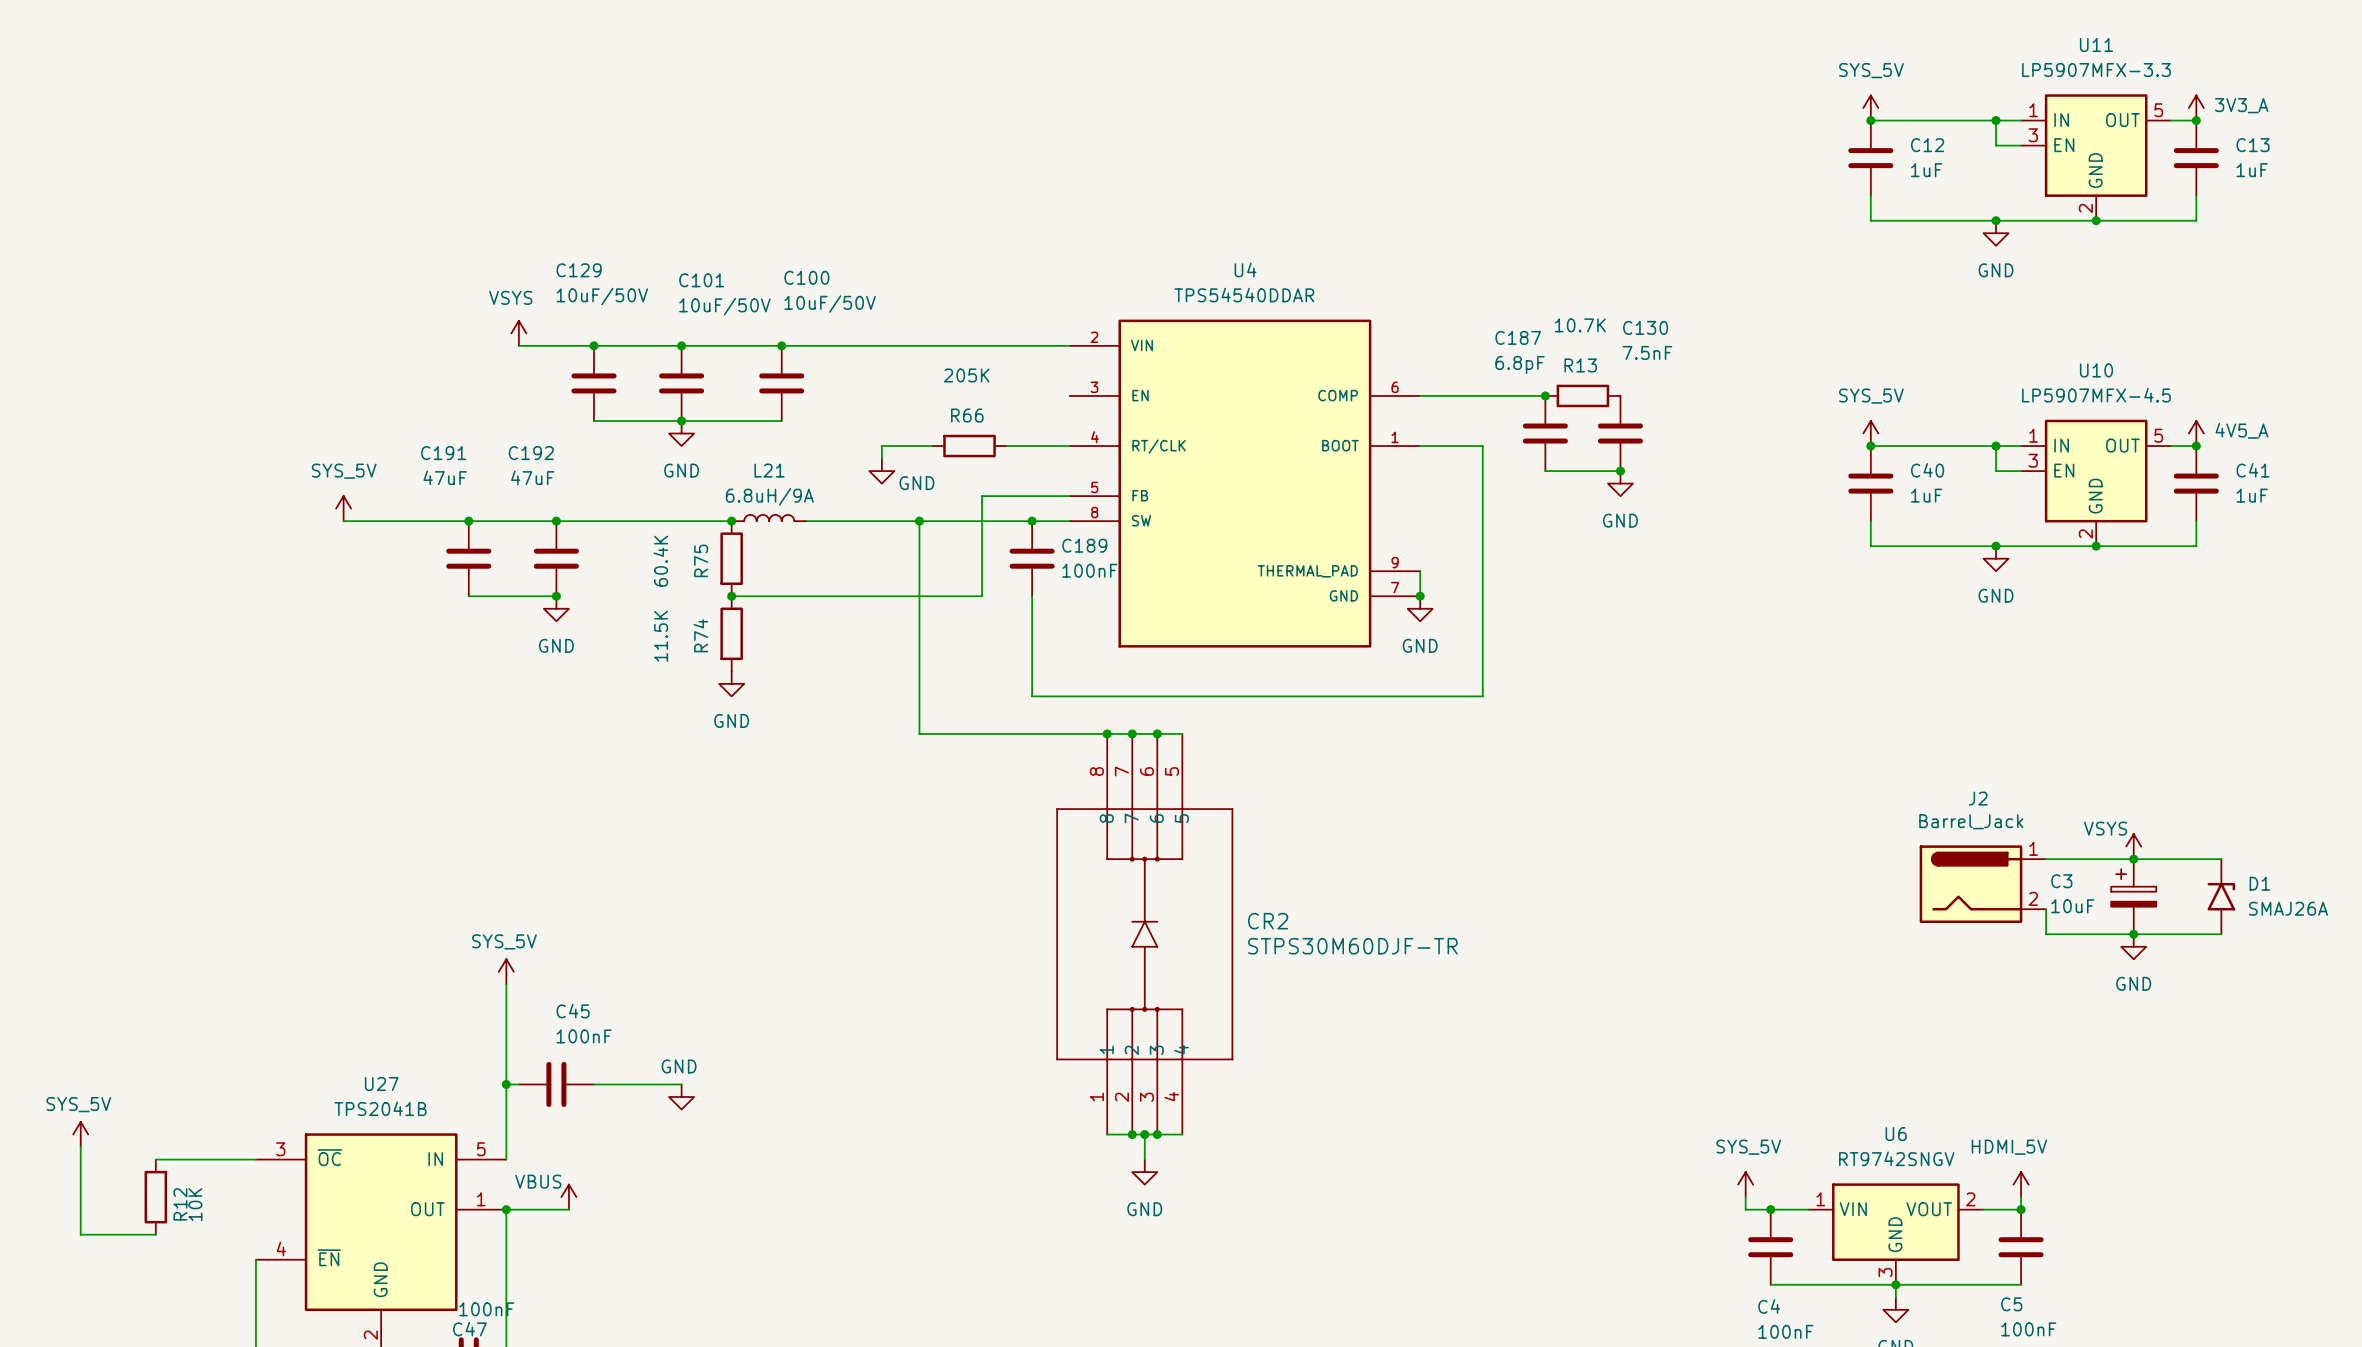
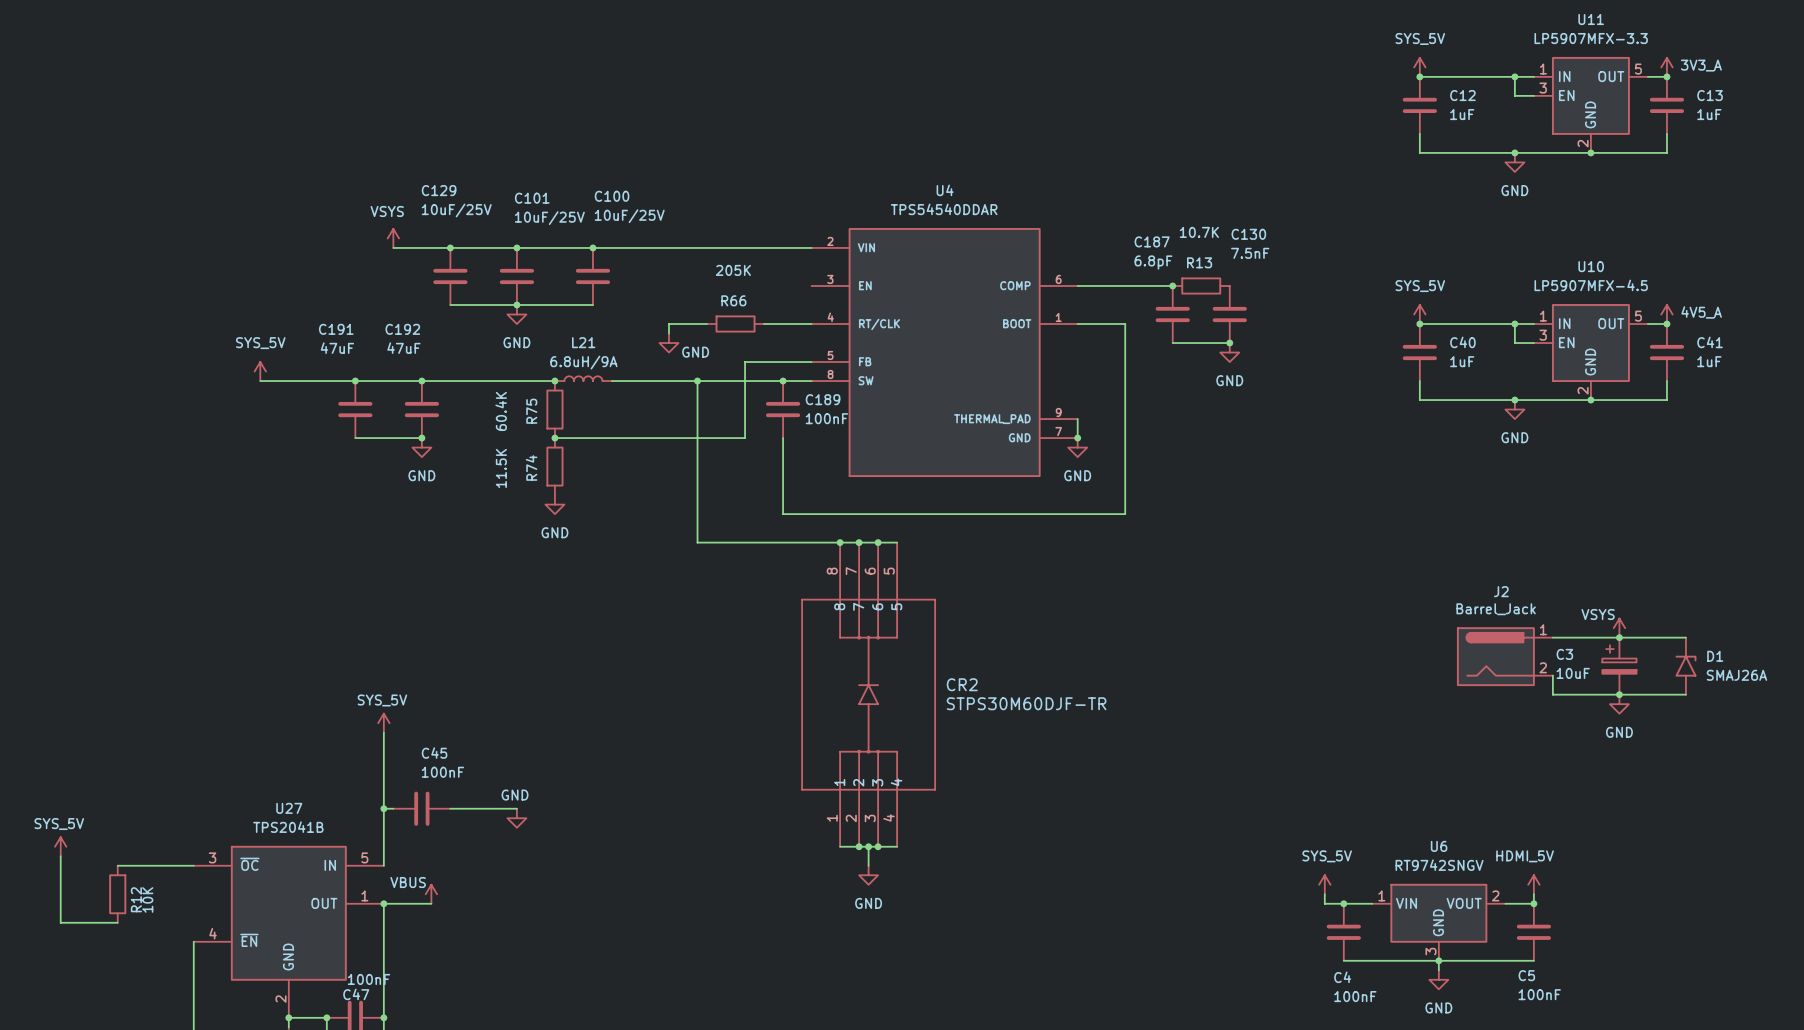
C129 value: 10uF/50V (602, 296) -> 10uF/25V (456, 210)
C100 value: 10uF/50V (830, 304) -> 10uF/25V (629, 216)
C101 value: 10uF/50V (724, 306) -> 10uF/25V (549, 218)

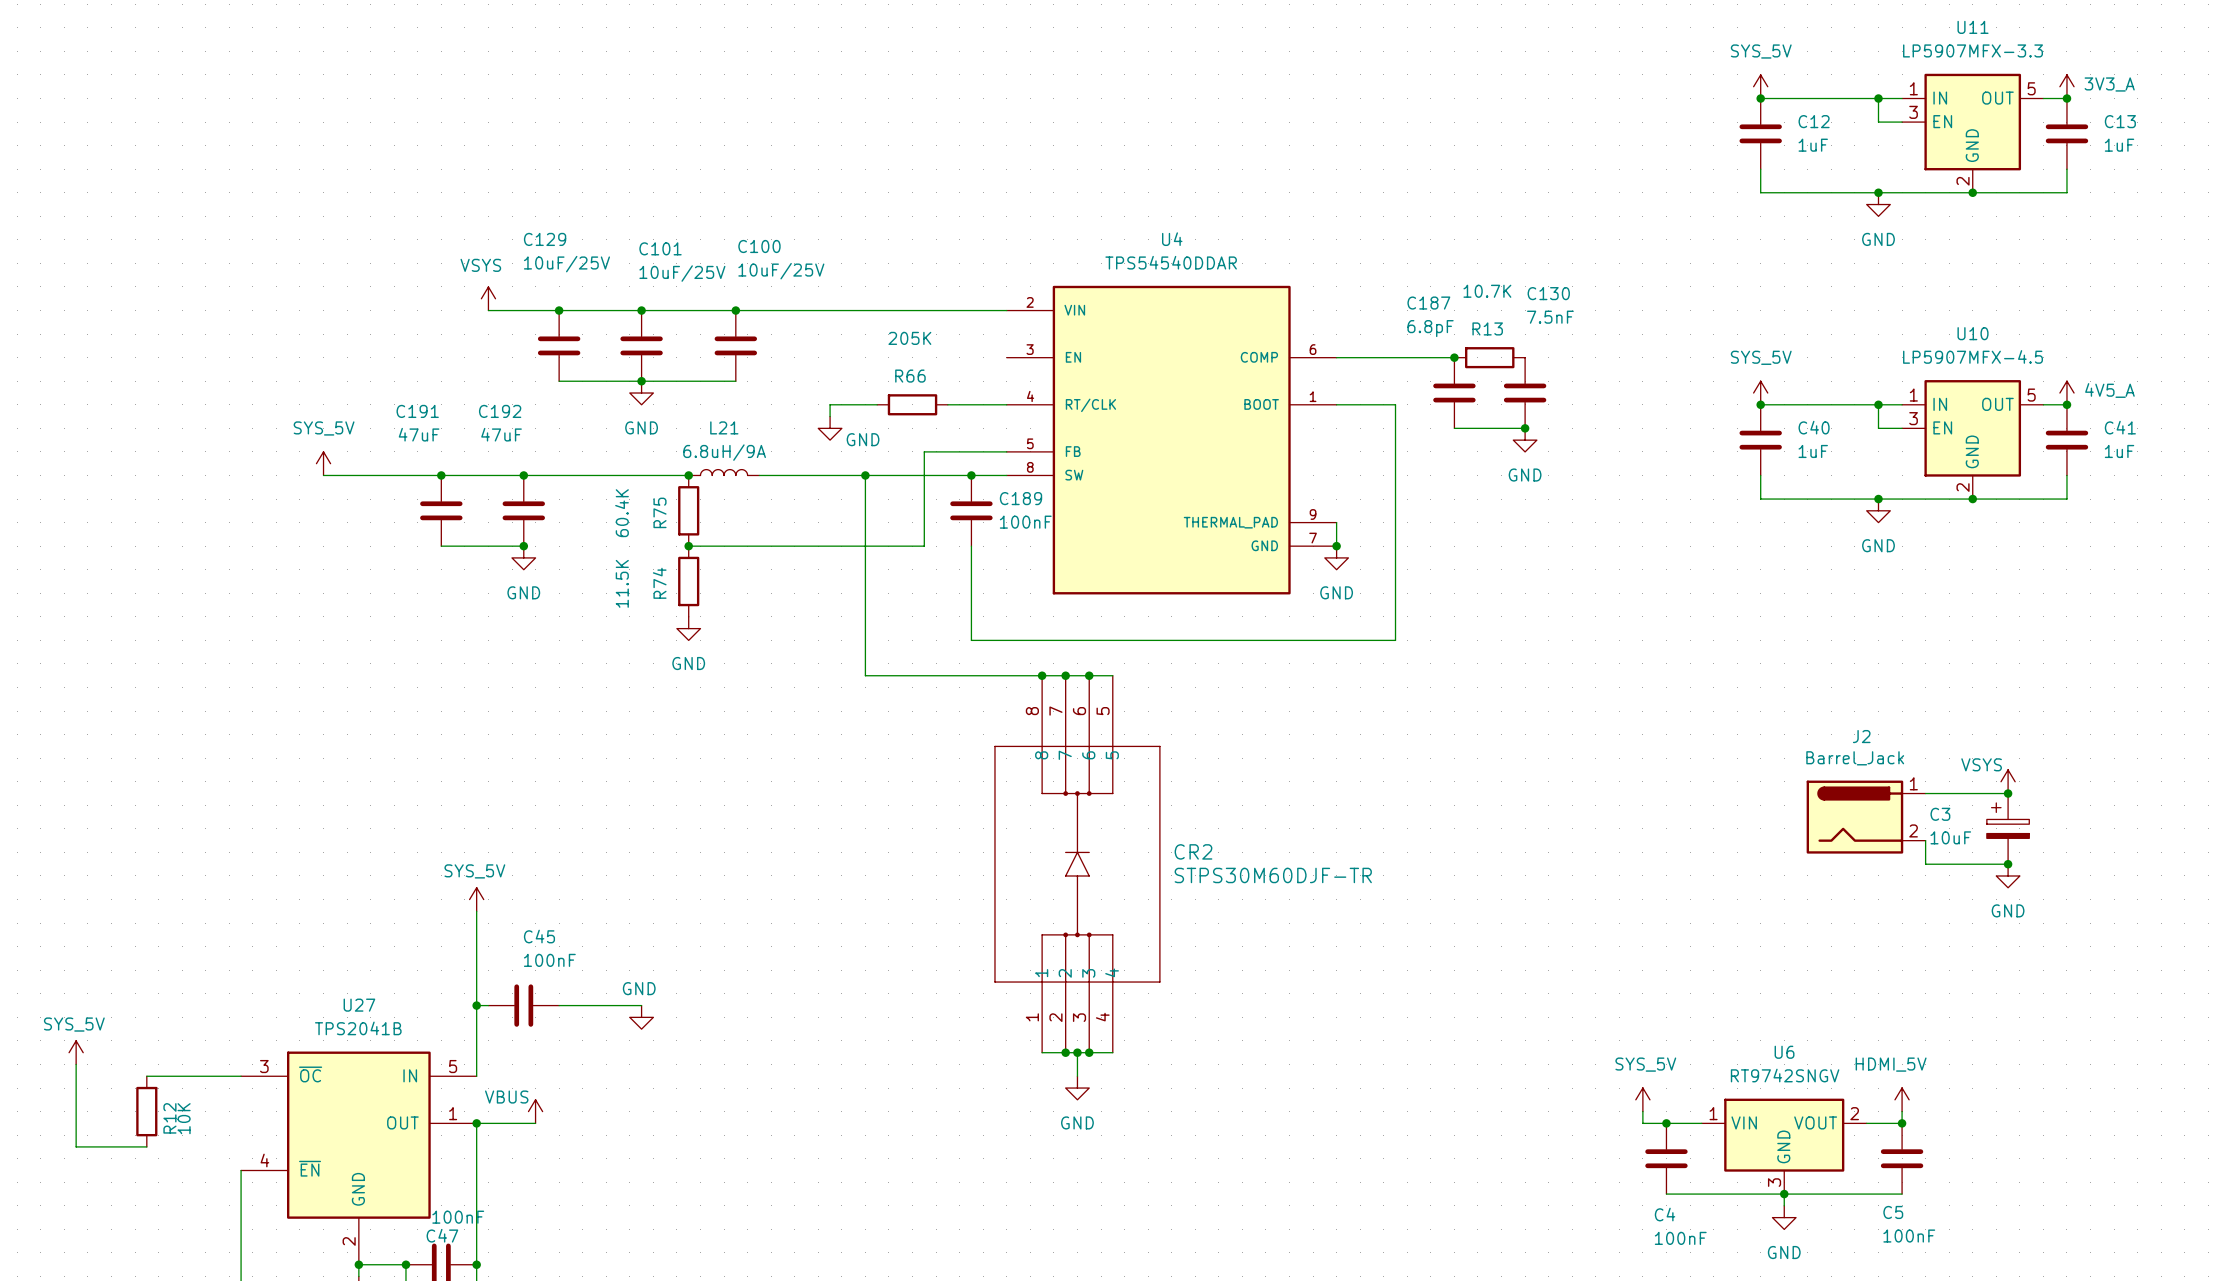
wire: (1619, 637) (1685, 637) -> none
D1: SMAJ26A (1685, 666) -> none
wire: (1619, 694) (1685, 694) -> none

